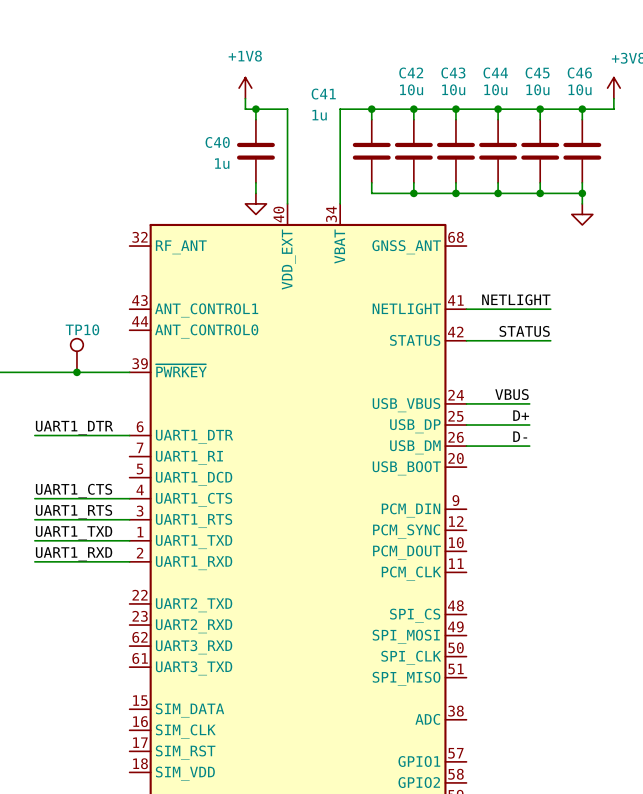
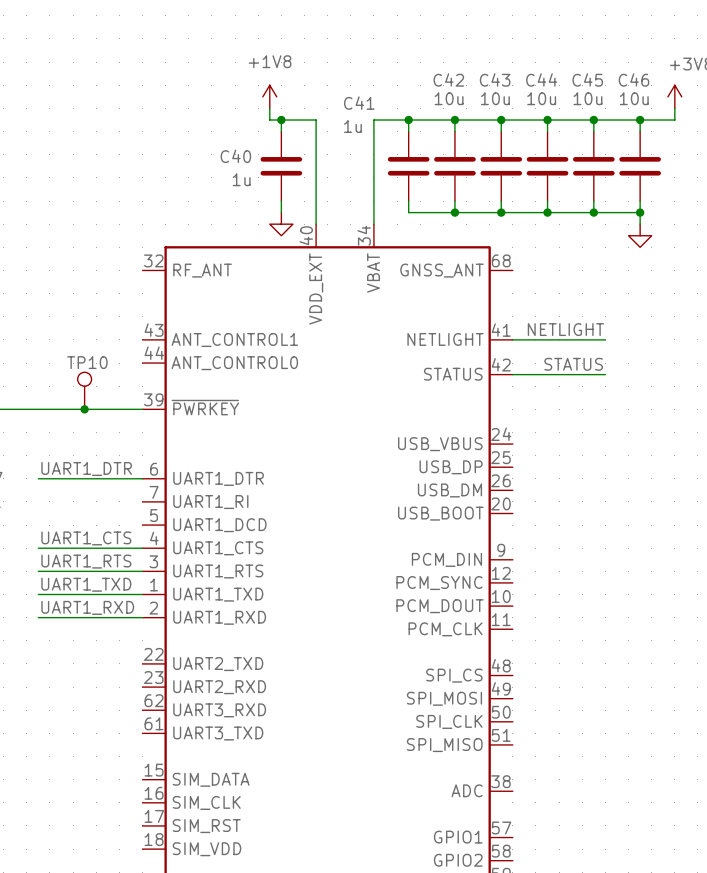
label: VBUS (512, 394) -> none
wire: (466, 403) (529, 403) -> none
label: D+ (521, 415) -> none
wire: (466, 425) (529, 425) -> none
label: D- (520, 436) -> none
wire: (466, 446) (529, 446) -> none

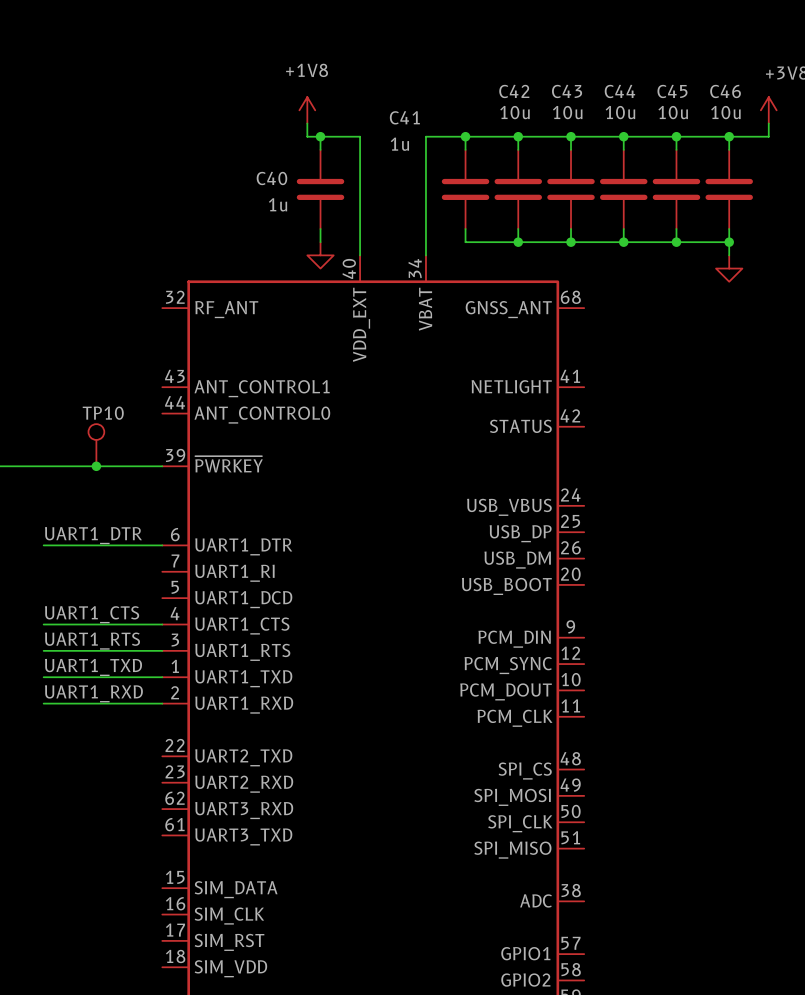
label: NETLIGHT (565, 329) -> none
wire: (512, 339) (605, 339) -> none
label: STATUS (573, 364) -> none
wire: (512, 374) (605, 374) -> none

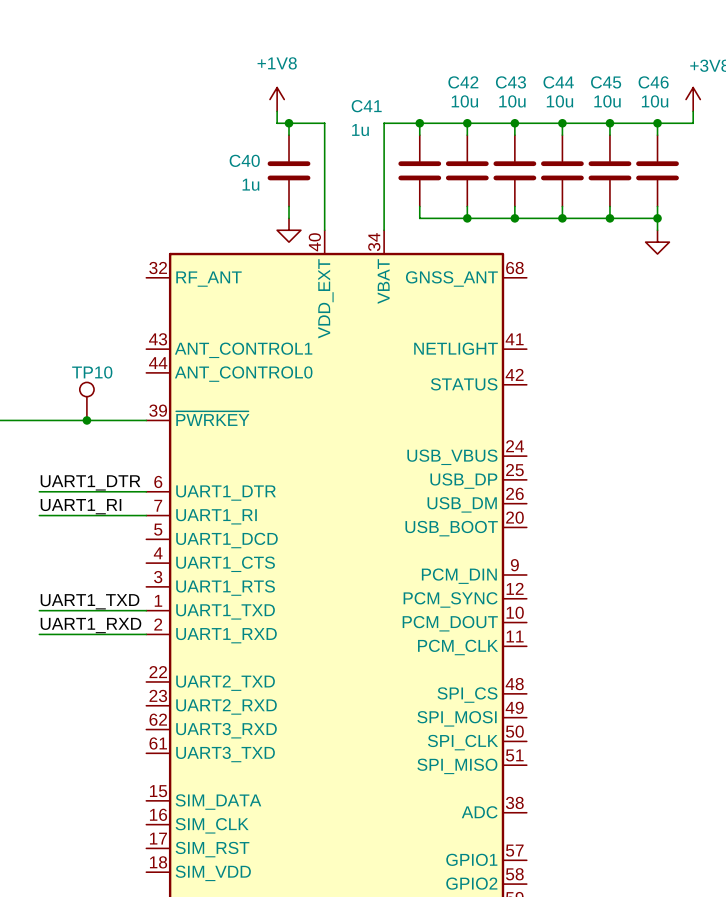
label: none -> UART1_RI (81, 506)
label: UART1_CTS (92, 614) -> none
wire: (43, 624) (162, 624) -> (39, 515) (146, 515)
label: UART1_RTS (92, 641) -> none
wire: (43, 650) (162, 650) -> none

